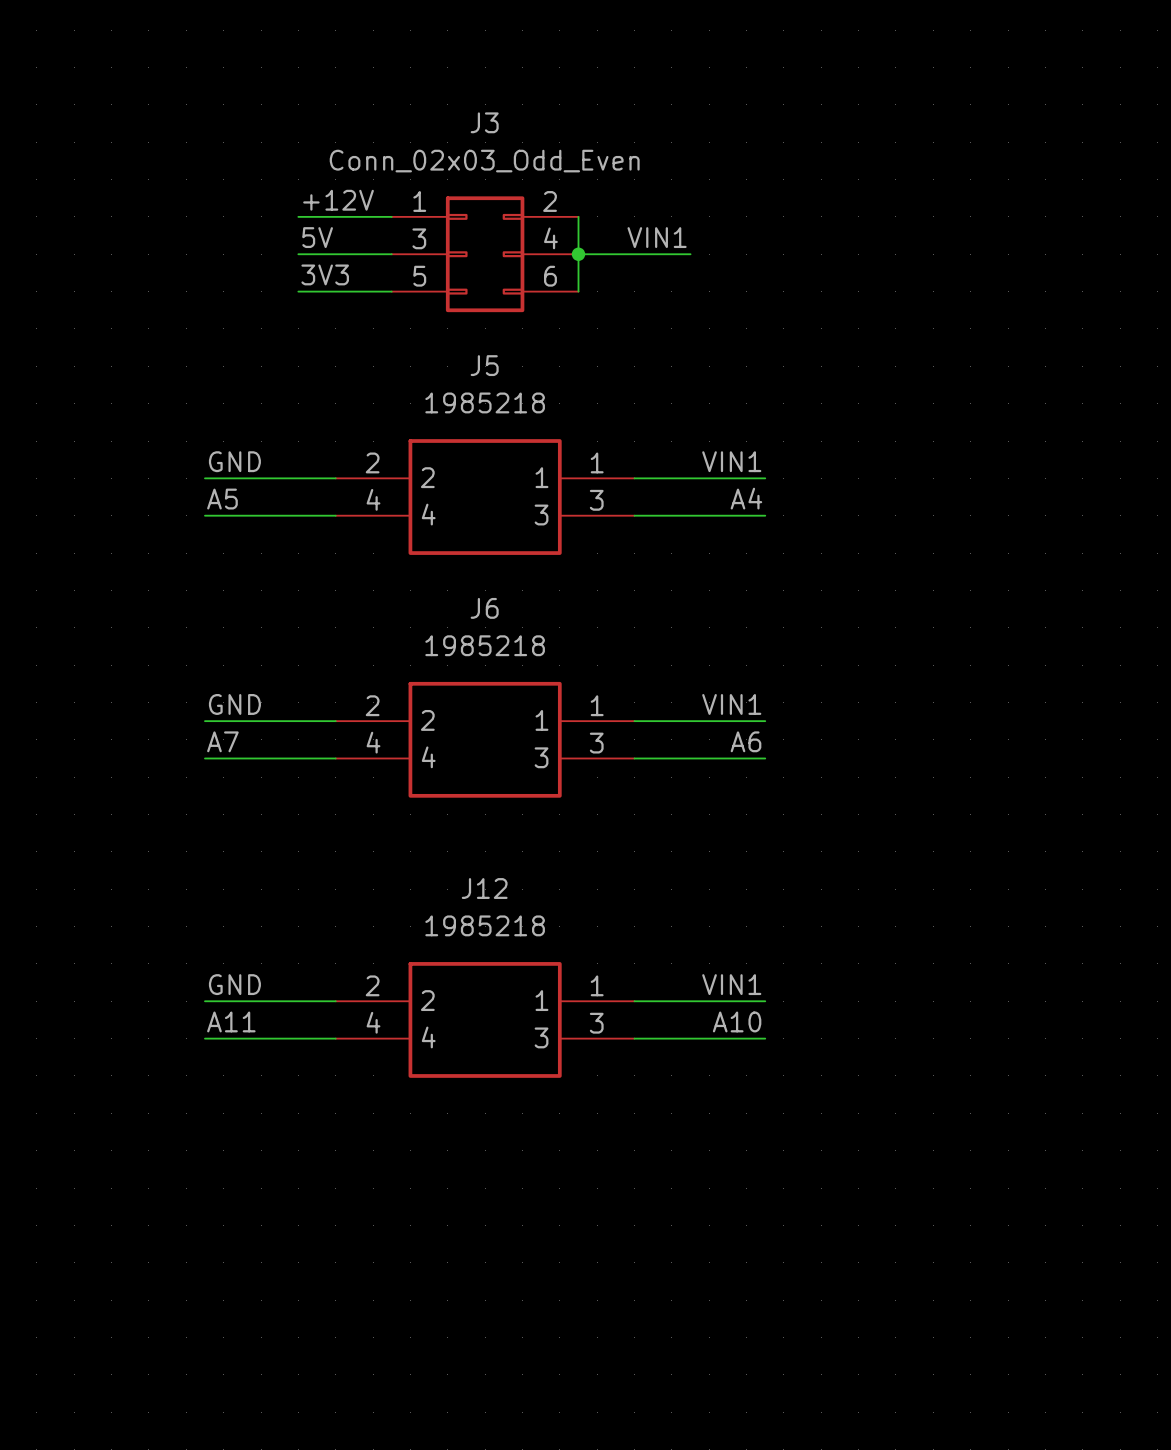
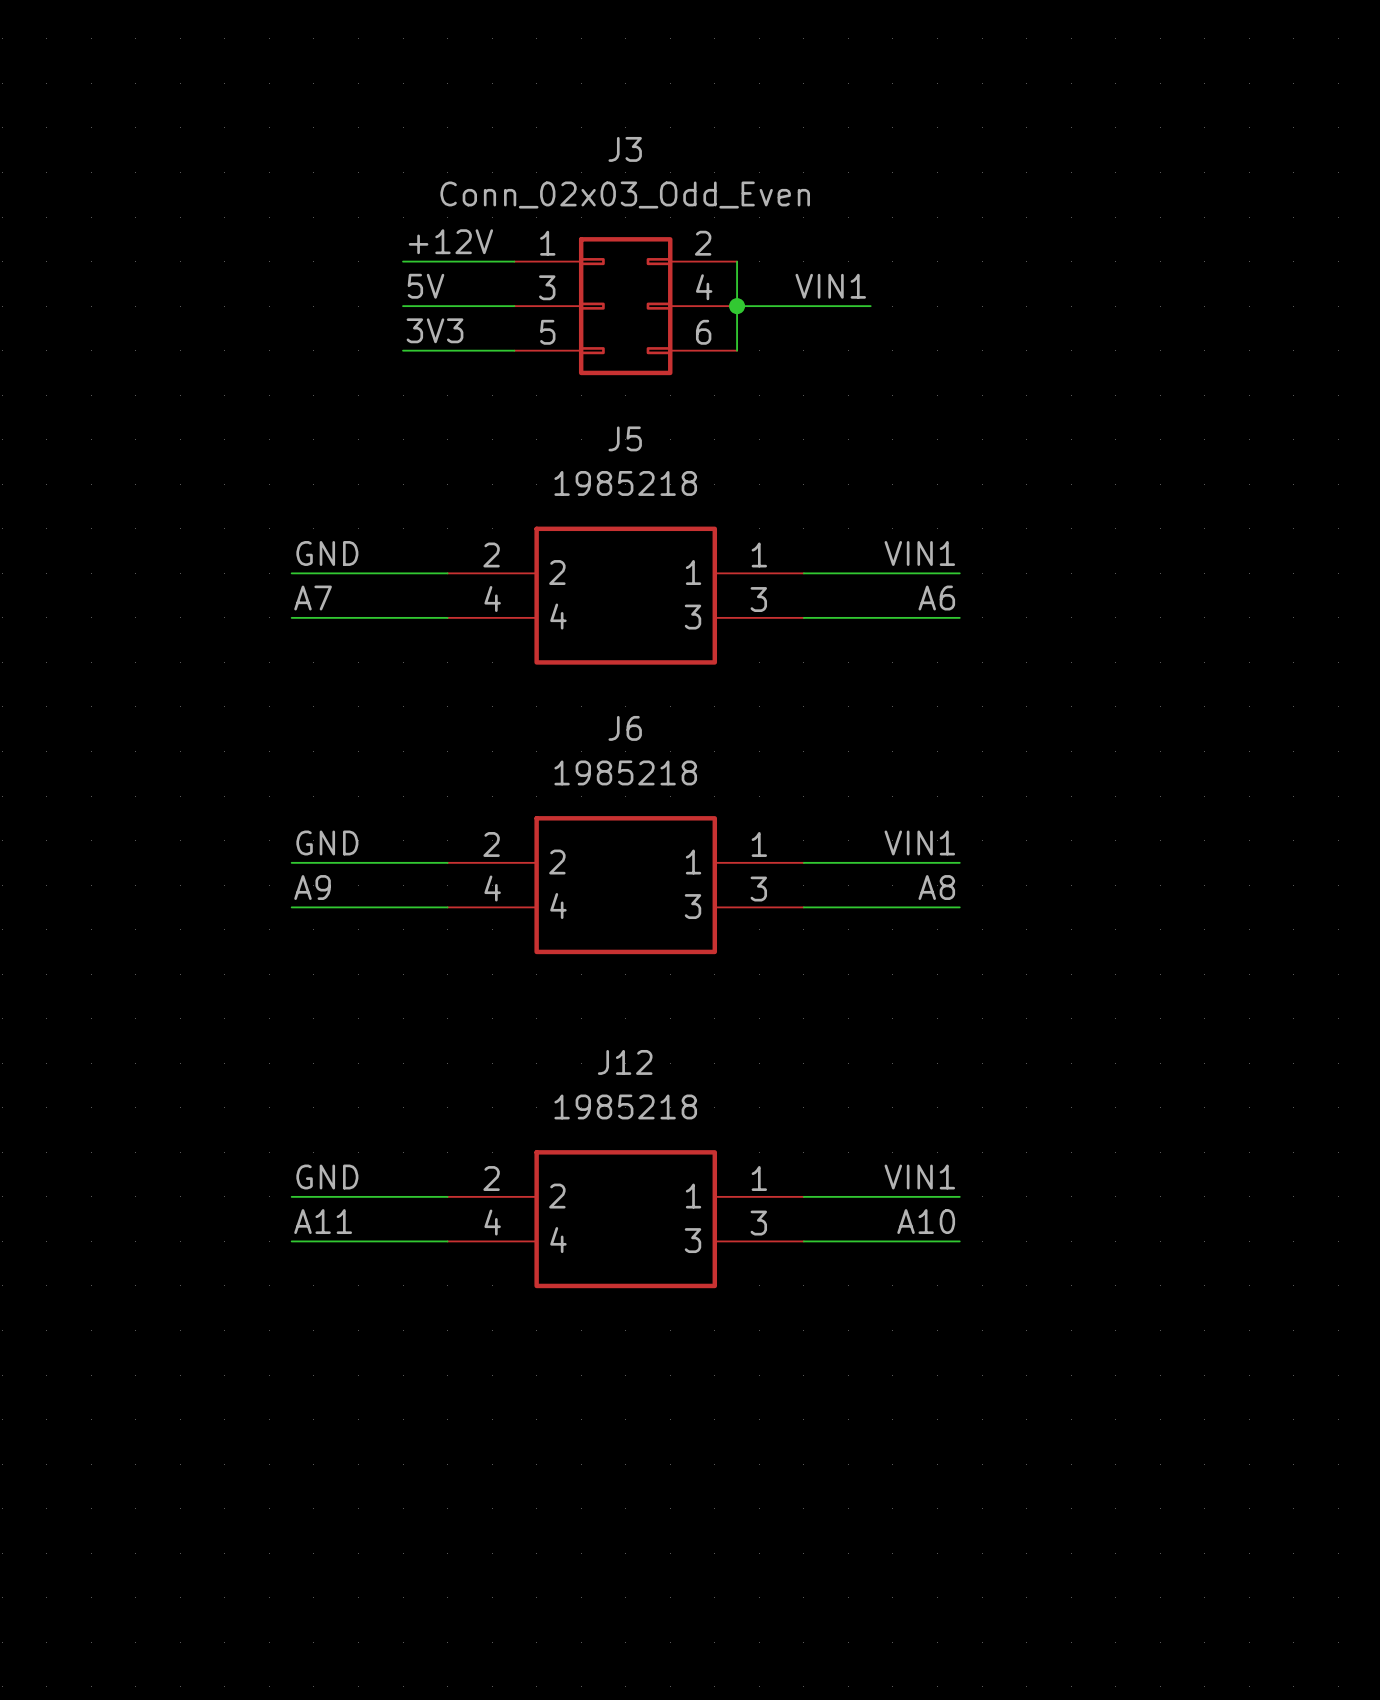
label: A4 (746, 498) -> A6 (936, 598)
label: A5 (222, 499) -> A7 (313, 598)
label: A7 (222, 741) -> A9 (312, 887)
label: A6 (745, 741) -> A8 (936, 887)

